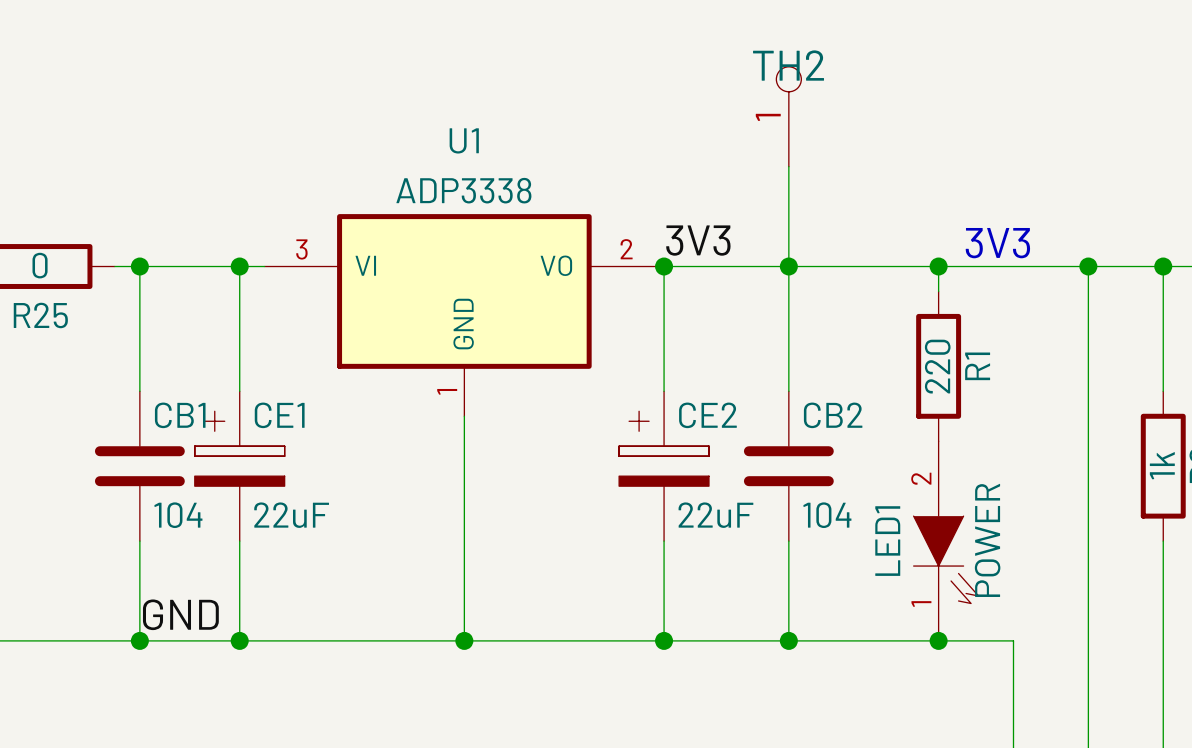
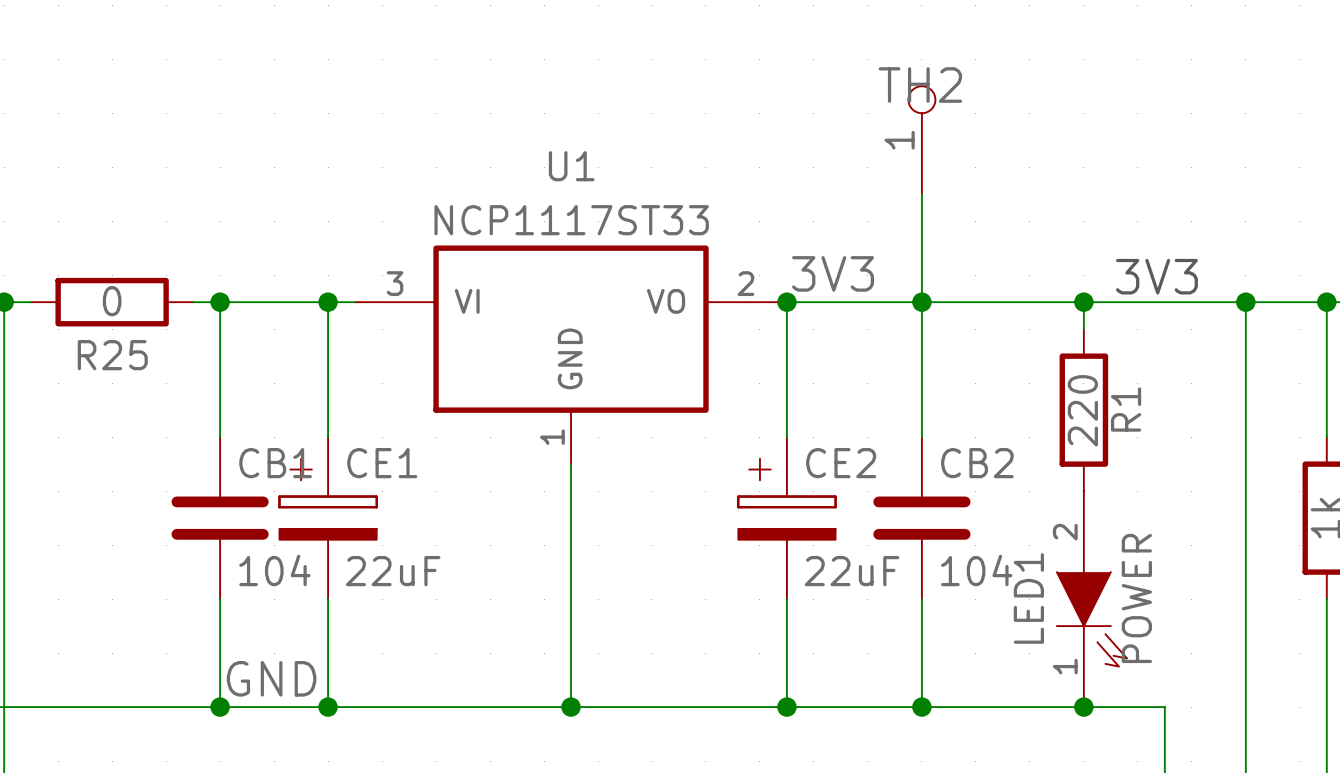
U1 value: ADP3338 (463, 190) -> NCP1117ST33 (571, 220)

